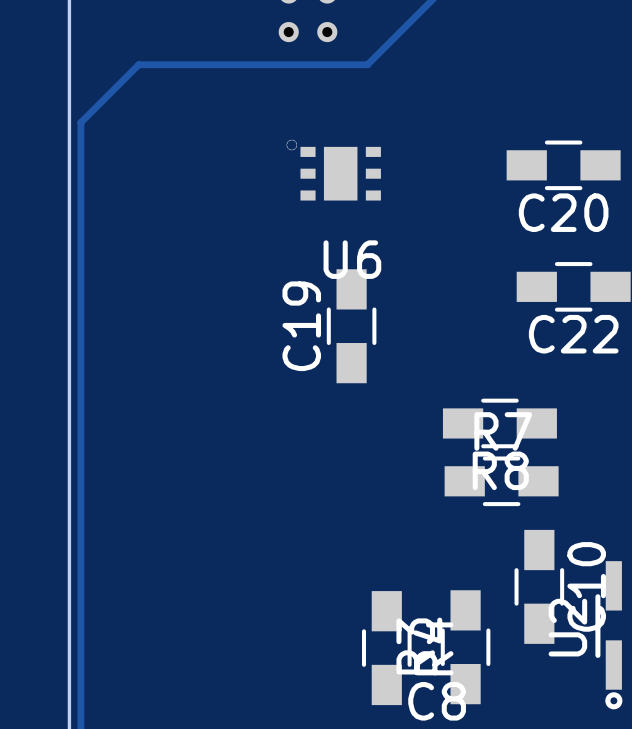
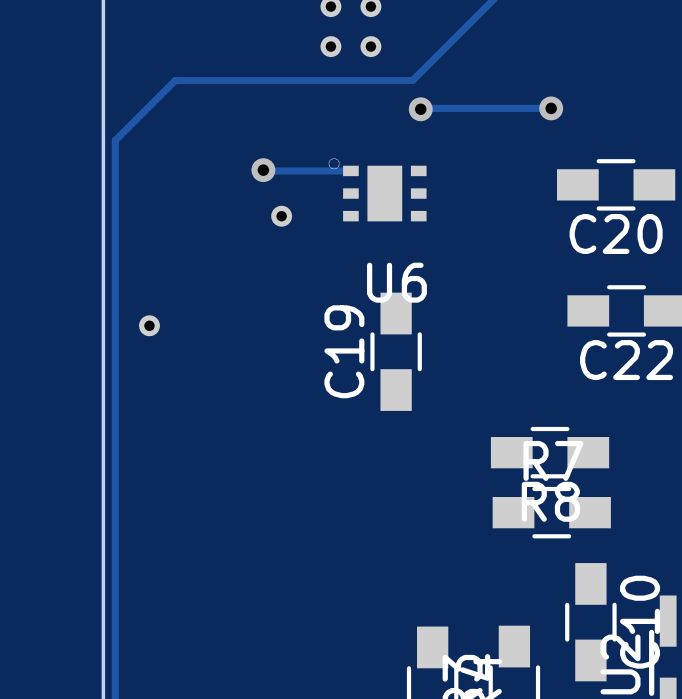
track: none -> (551, 108) (420, 109)
via: none -> (551, 108)
via: none -> (420, 109)
track: none -> (263, 170) (350, 170)
via: none -> (263, 170)
part: none -> (281, 216)
part: none -> (149, 325)

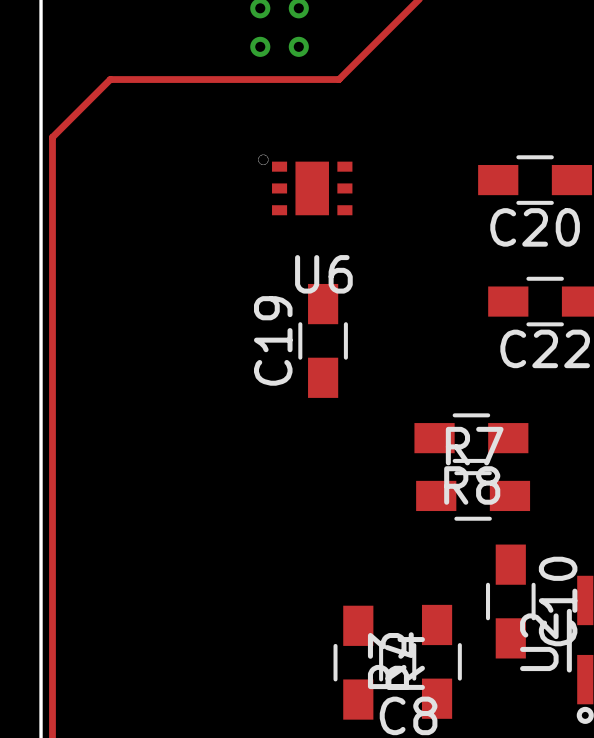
track: (551, 108) (420, 109) -> none
via: (551, 108) -> none
via: (420, 109) -> none
track: (263, 170) (350, 170) -> none
via: (263, 170) -> none
part: (281, 216) -> none
part: (149, 325) -> none

